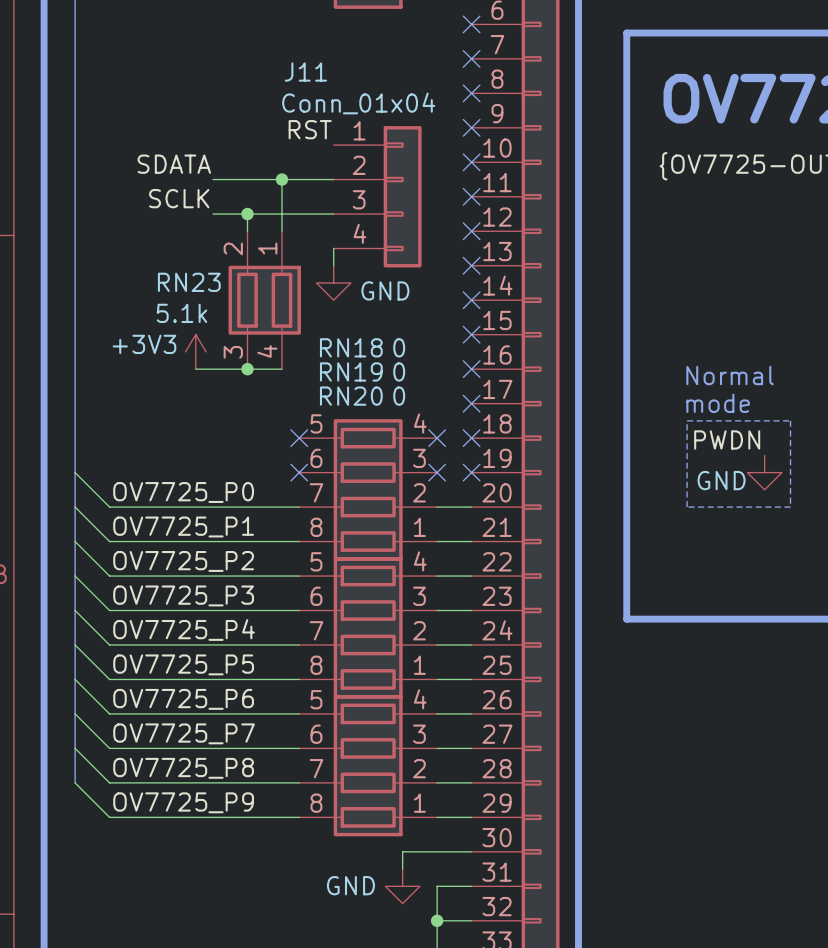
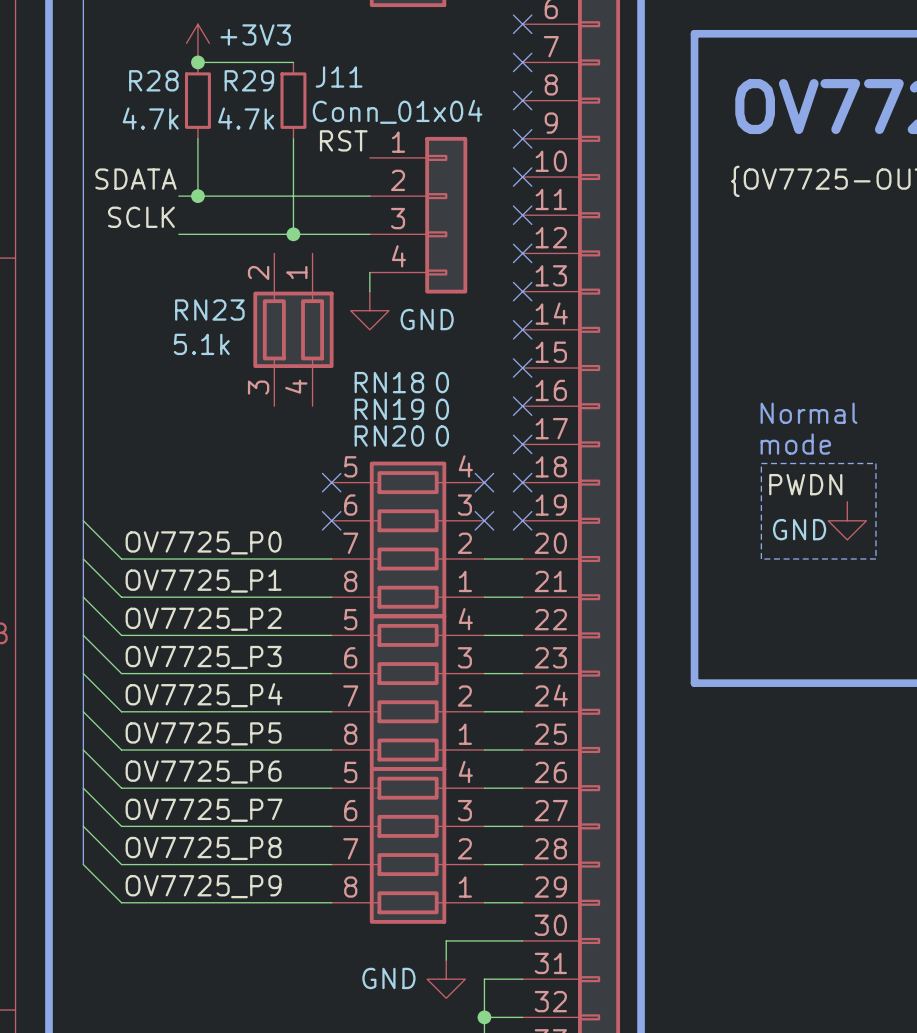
junction: none -> (197, 62)
R28: none -> 4.7k (197, 100)
R29: none -> 4.7k (293, 100)
wire: none -> (293, 138) (293, 234)
label position: SDATA (174, 164) -> SDATA (135, 179)
wire: none -> (178, 196) (236, 196)
junction: none -> (197, 196)
wire: (281, 179) (281, 231) -> (197, 138) (197, 196)
junction: (281, 179) -> none
label position: SCLK (179, 198) -> SCLK (141, 217)
wire: none -> (178, 234) (236, 234)
wire: (247, 214) (247, 231) -> none
junction position: (247, 214) -> (293, 234)
power symbol text position: +3V3 (144, 344) -> +3V3 (255, 34)
power symbol position: +3V3 (195, 351) -> +3V3 (197, 43)
wire: (195, 369) (281, 369) -> (197, 62) (293, 62)
junction: (247, 369) -> none

